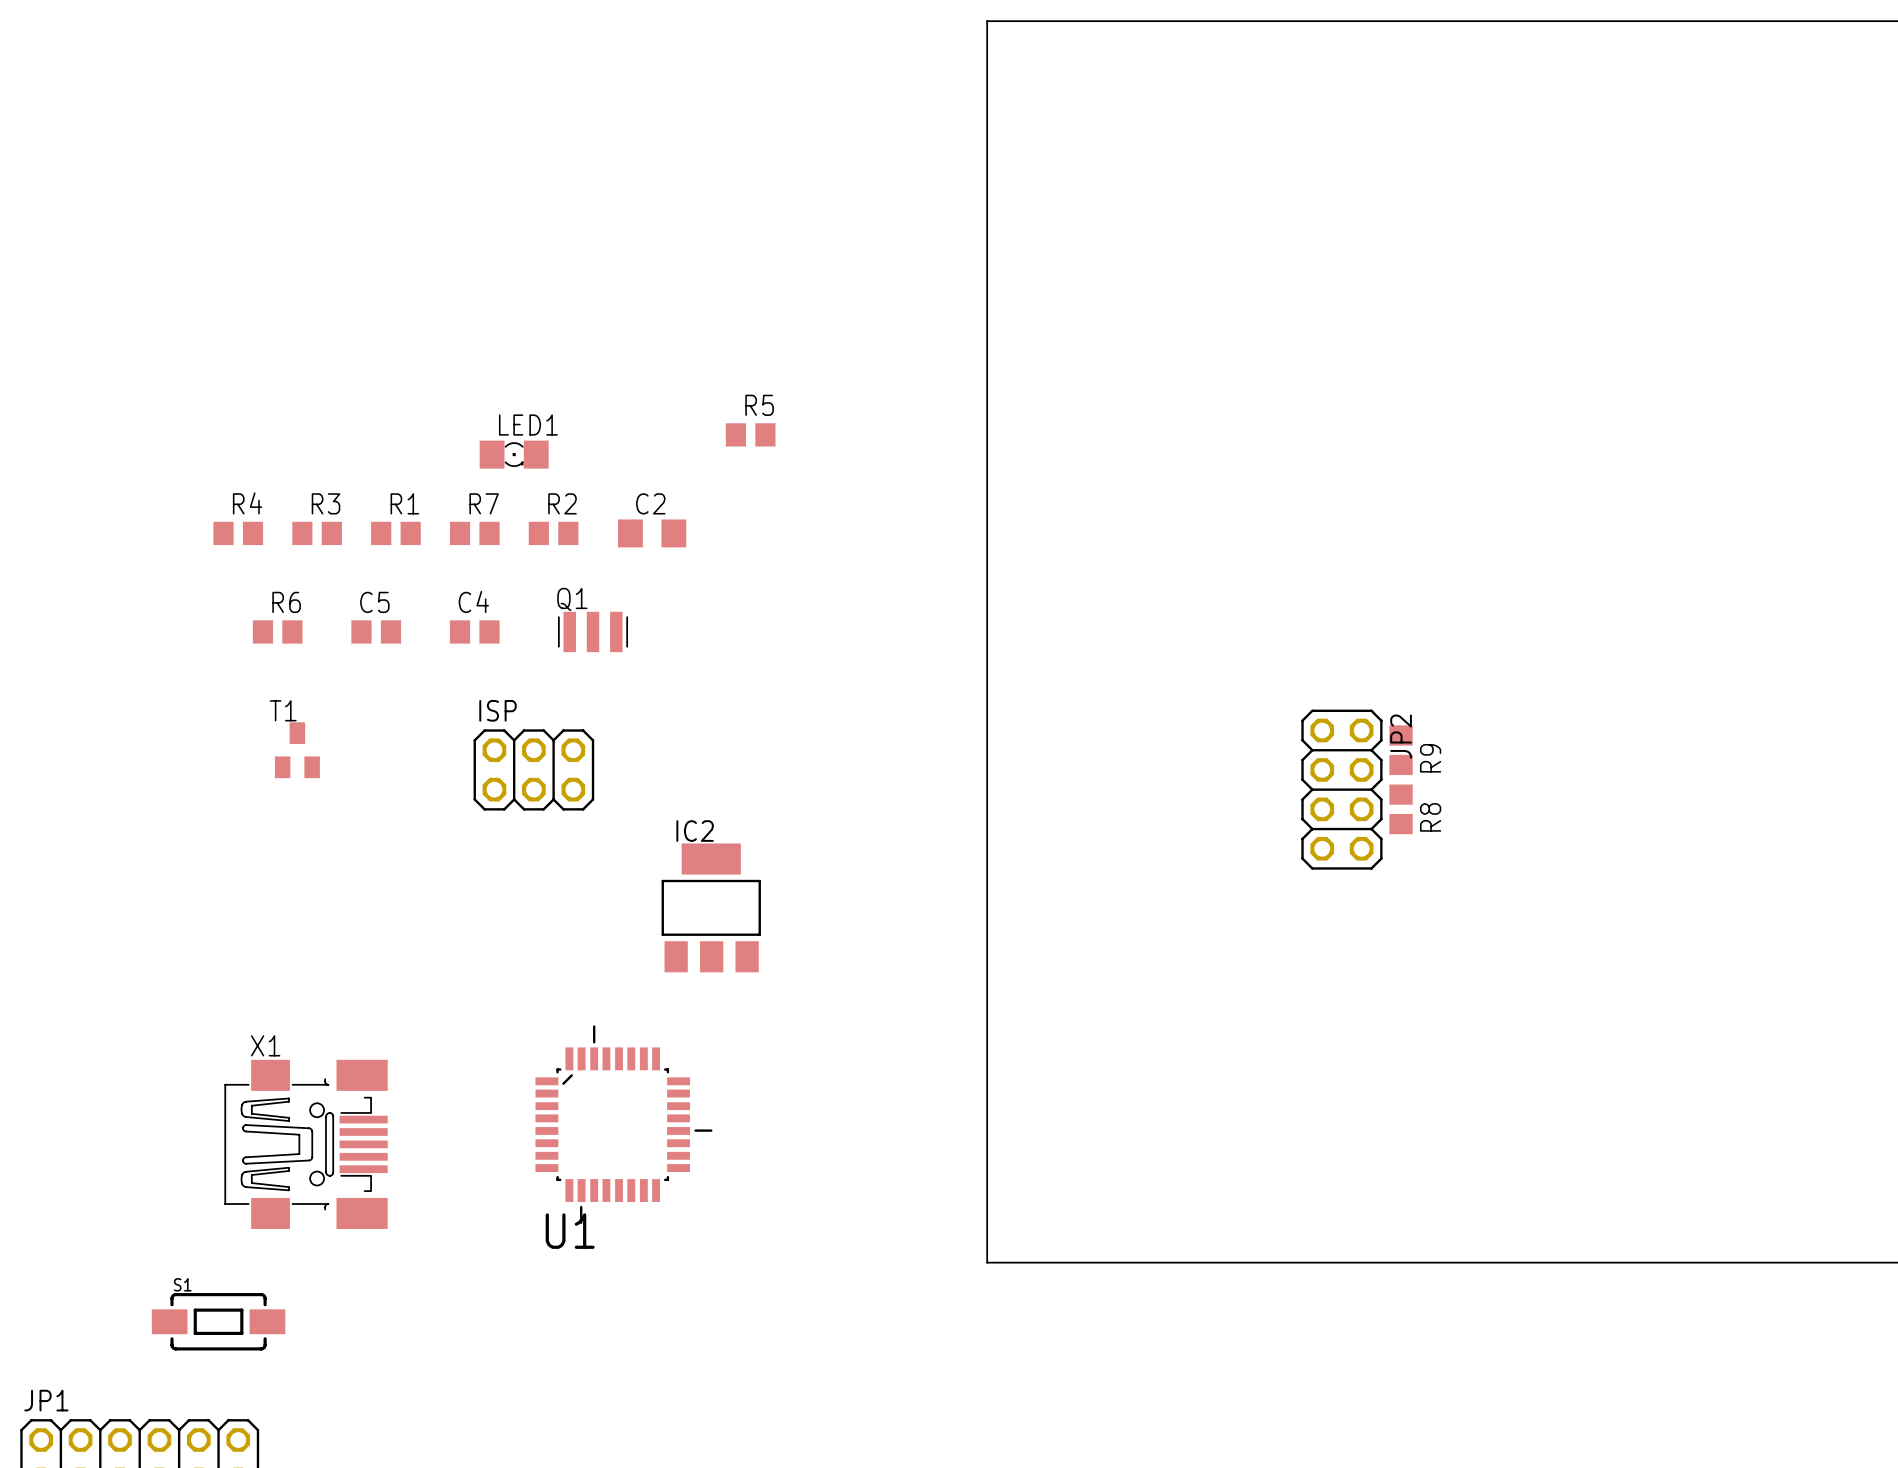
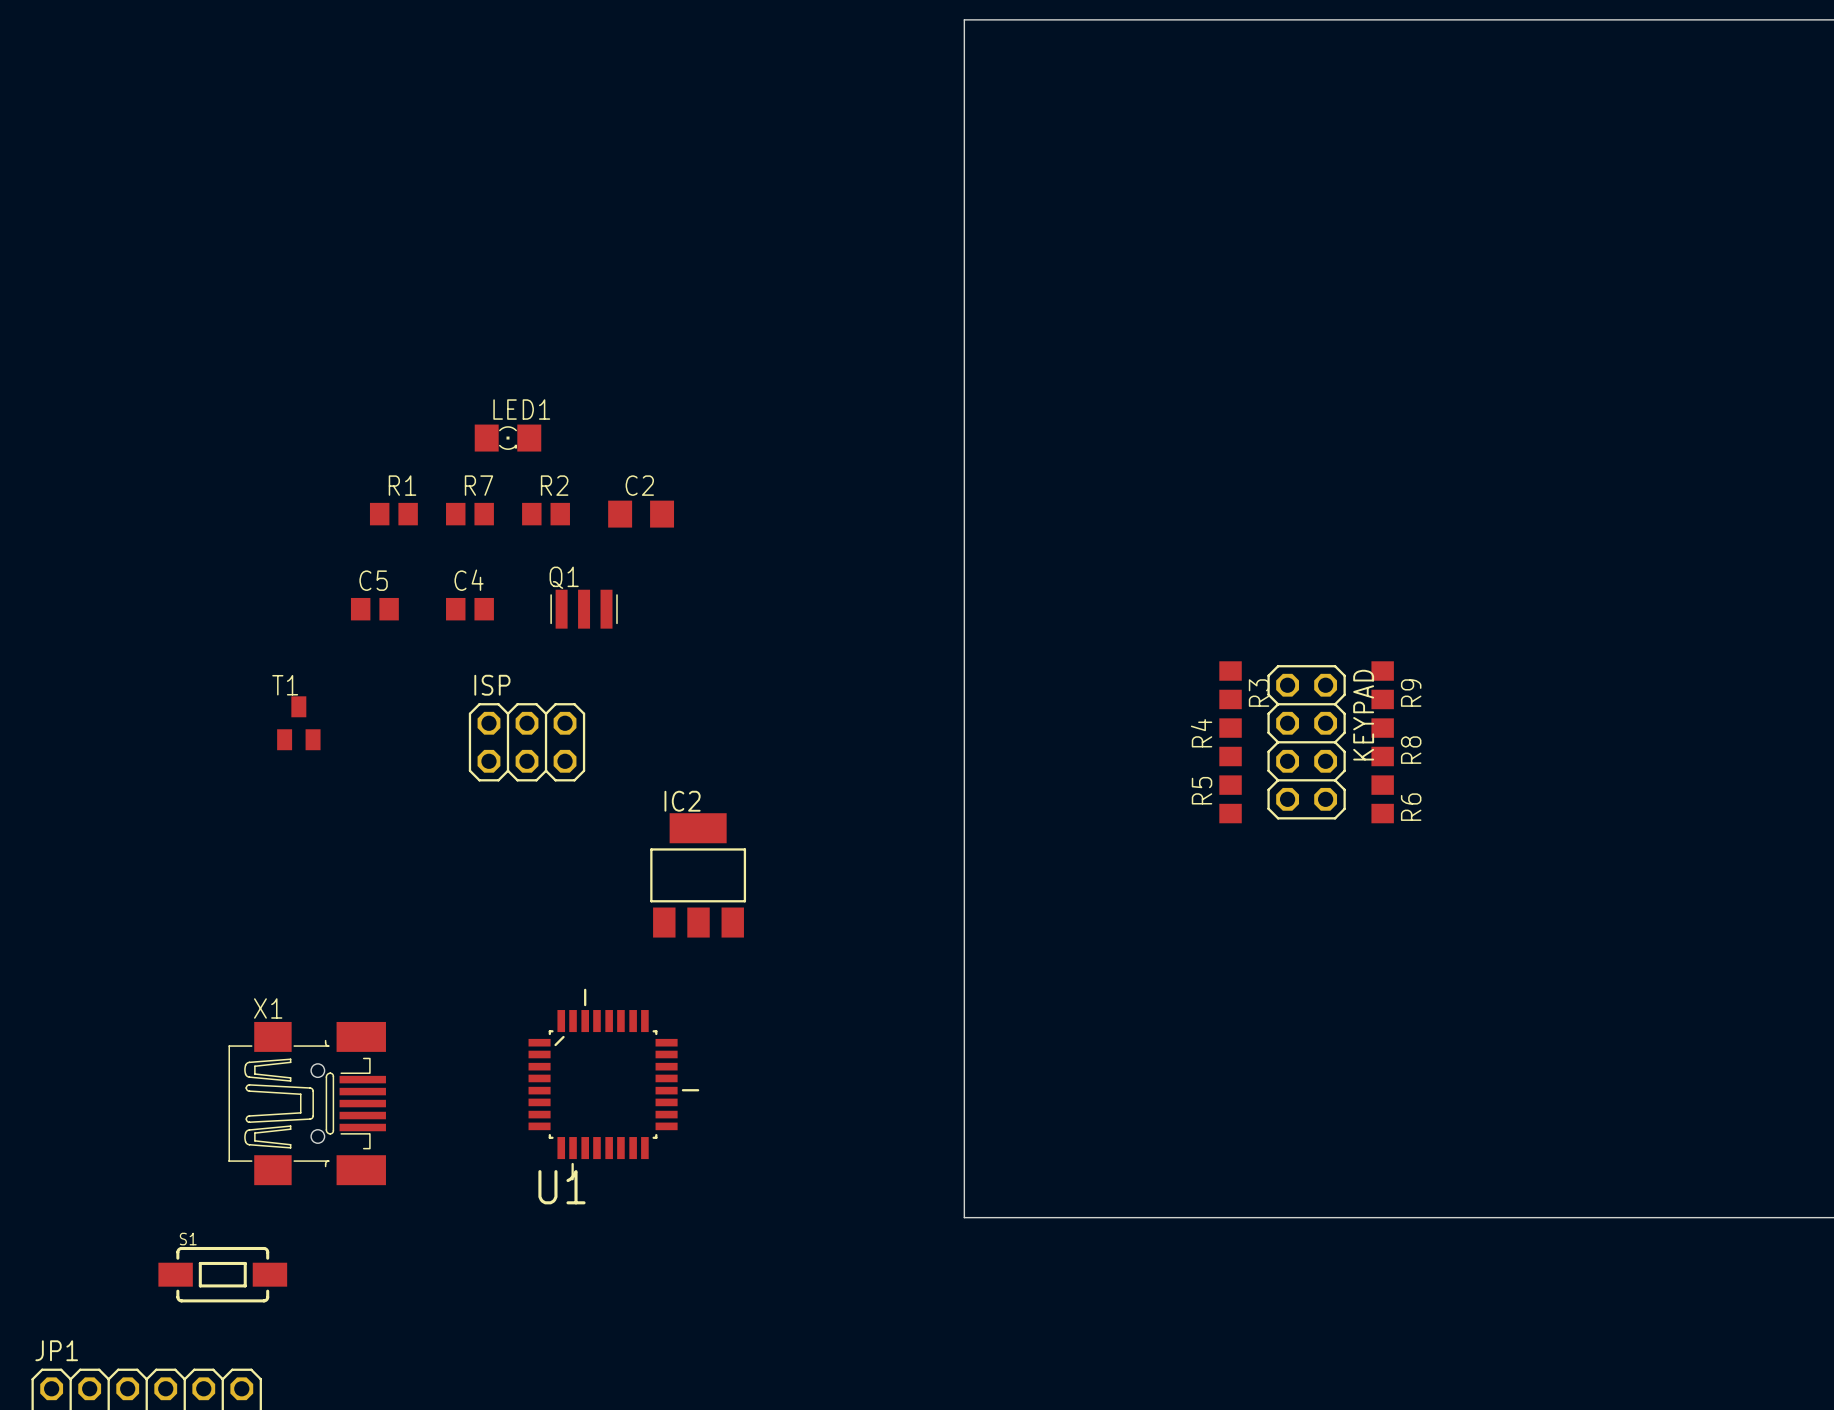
R5 name position: R5 (759, 405) -> R5 (1202, 790)
R5 rotation: 0° (750, 434) -> 90° clockwise (1230, 799)
R5 position: (750, 434) -> (1230, 799)
R4 name position: R4 (247, 503) -> R4 (1201, 733)
R4 rotation: 0° (238, 533) -> 90° clockwise (1230, 742)
R4 position: (238, 533) -> (1230, 742)
R3 rotation: 0° (317, 533) -> 90° clockwise (1230, 685)
R3 position: (317, 533) -> (1230, 685)
R6 rotation: 0° (277, 631) -> 90° clockwise (1382, 799)
R6 position: (277, 631) -> (1382, 799)
R9 position: (1401, 750) -> (1382, 685)
KEYPAD: none -> (1306, 742)
JP2: (1341, 789) -> none
R8 position: (1401, 809) -> (1382, 742)

